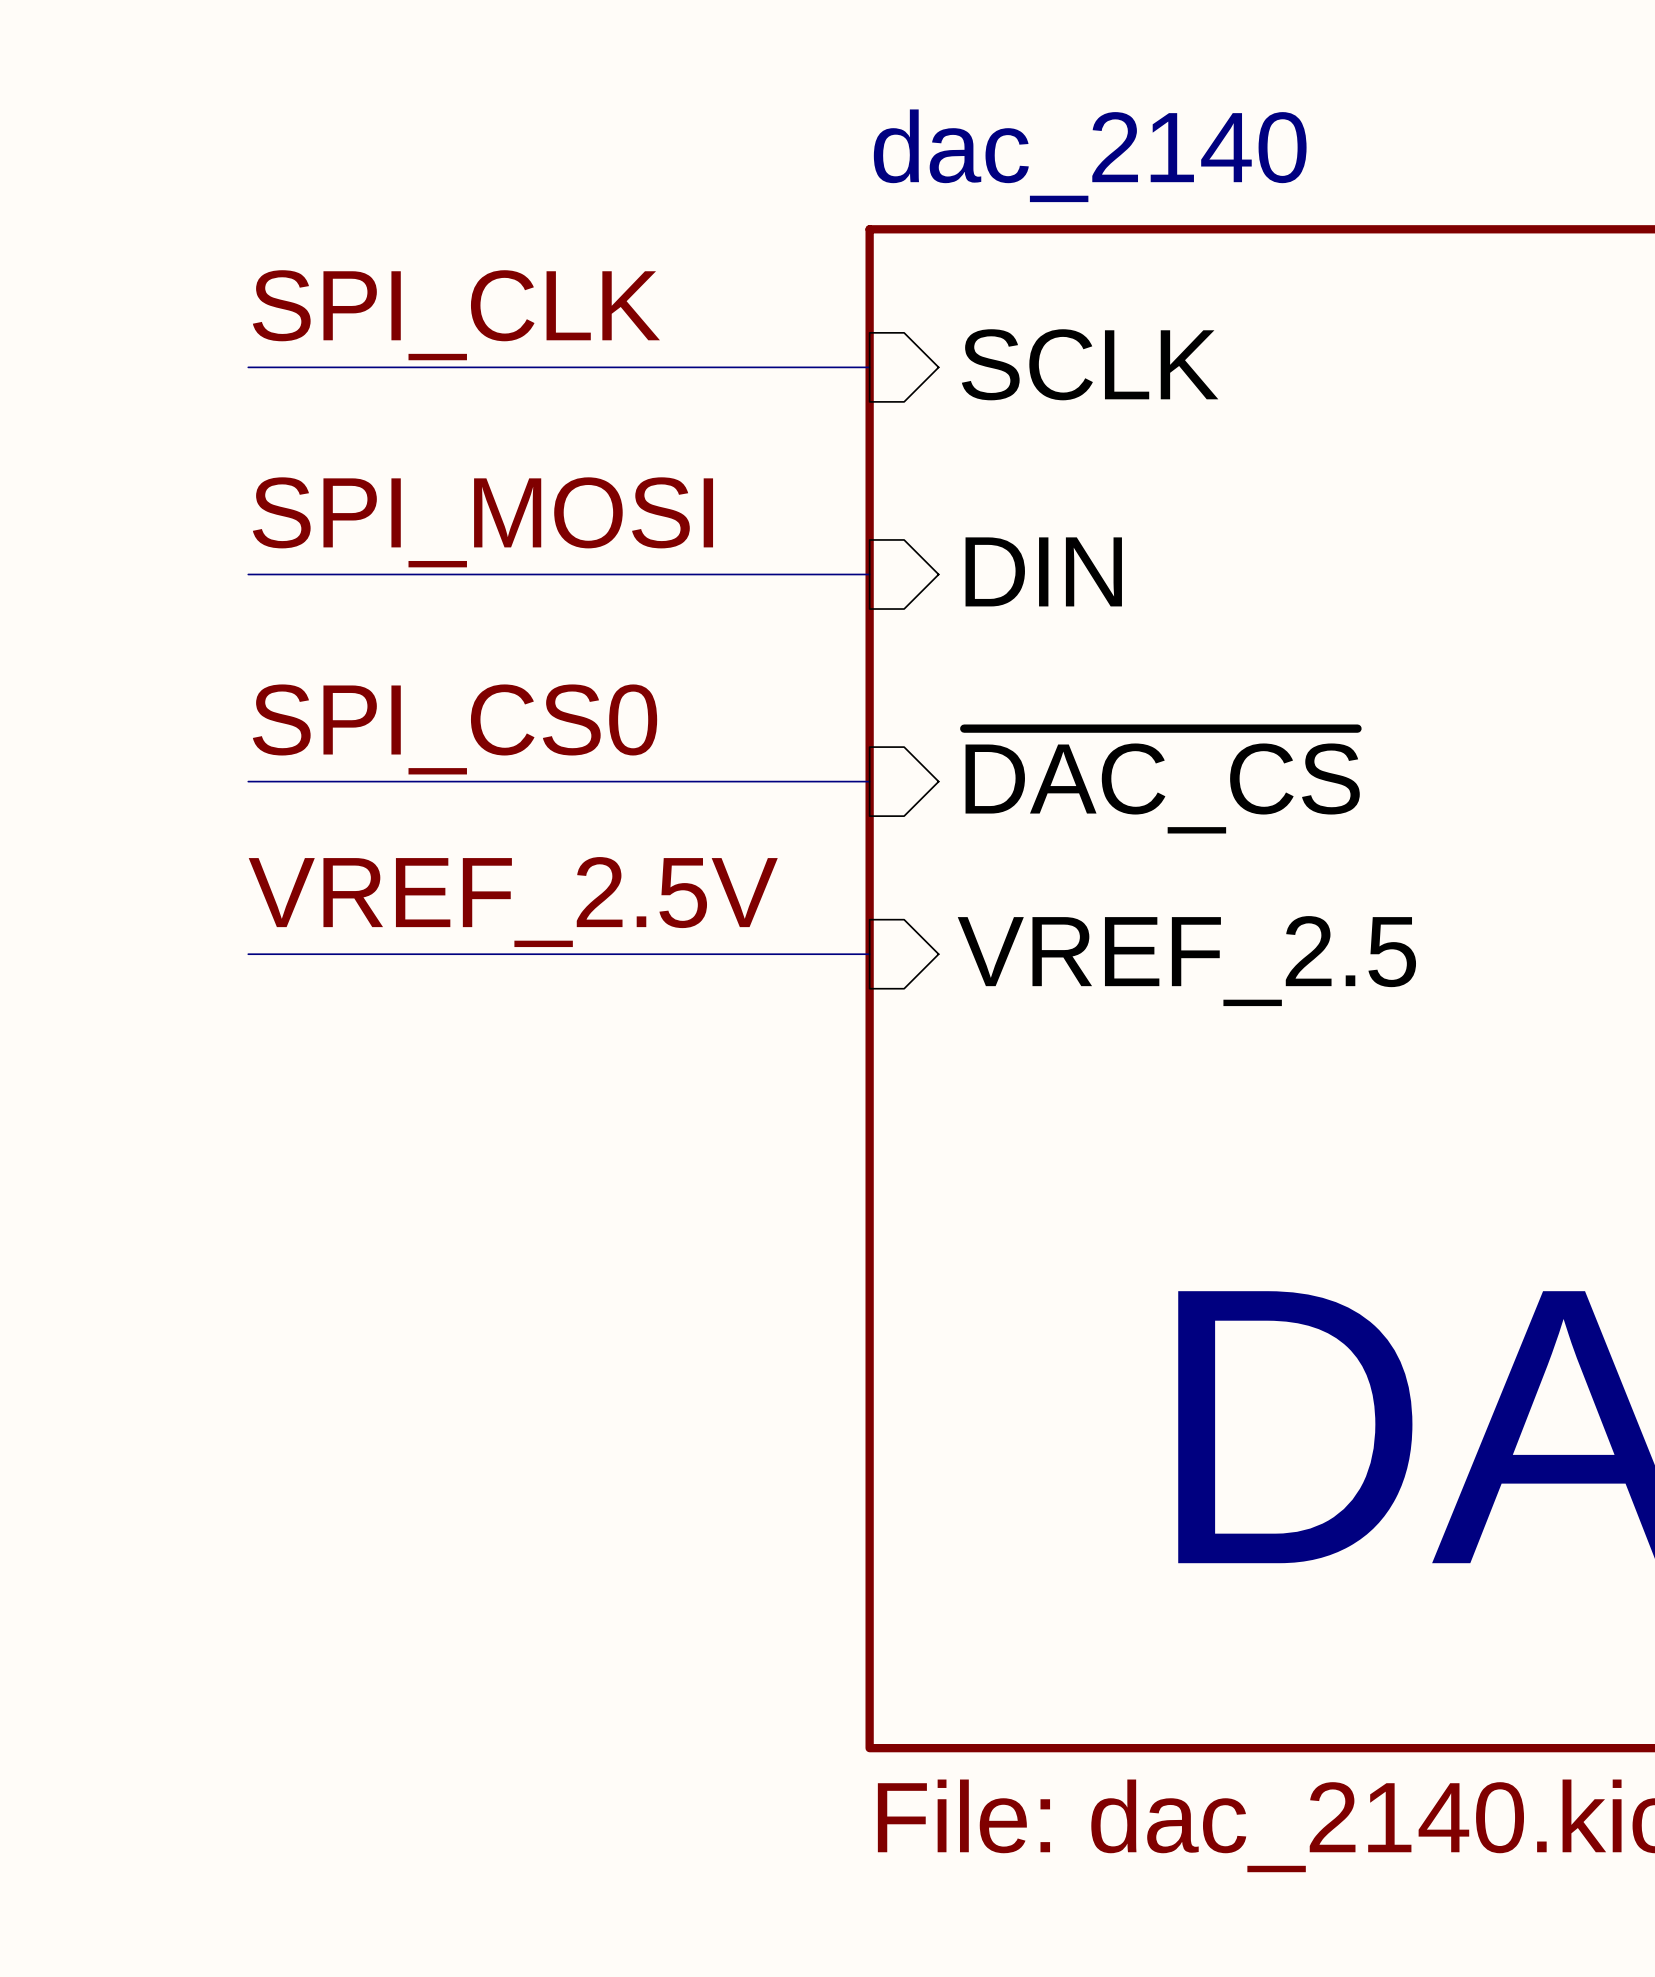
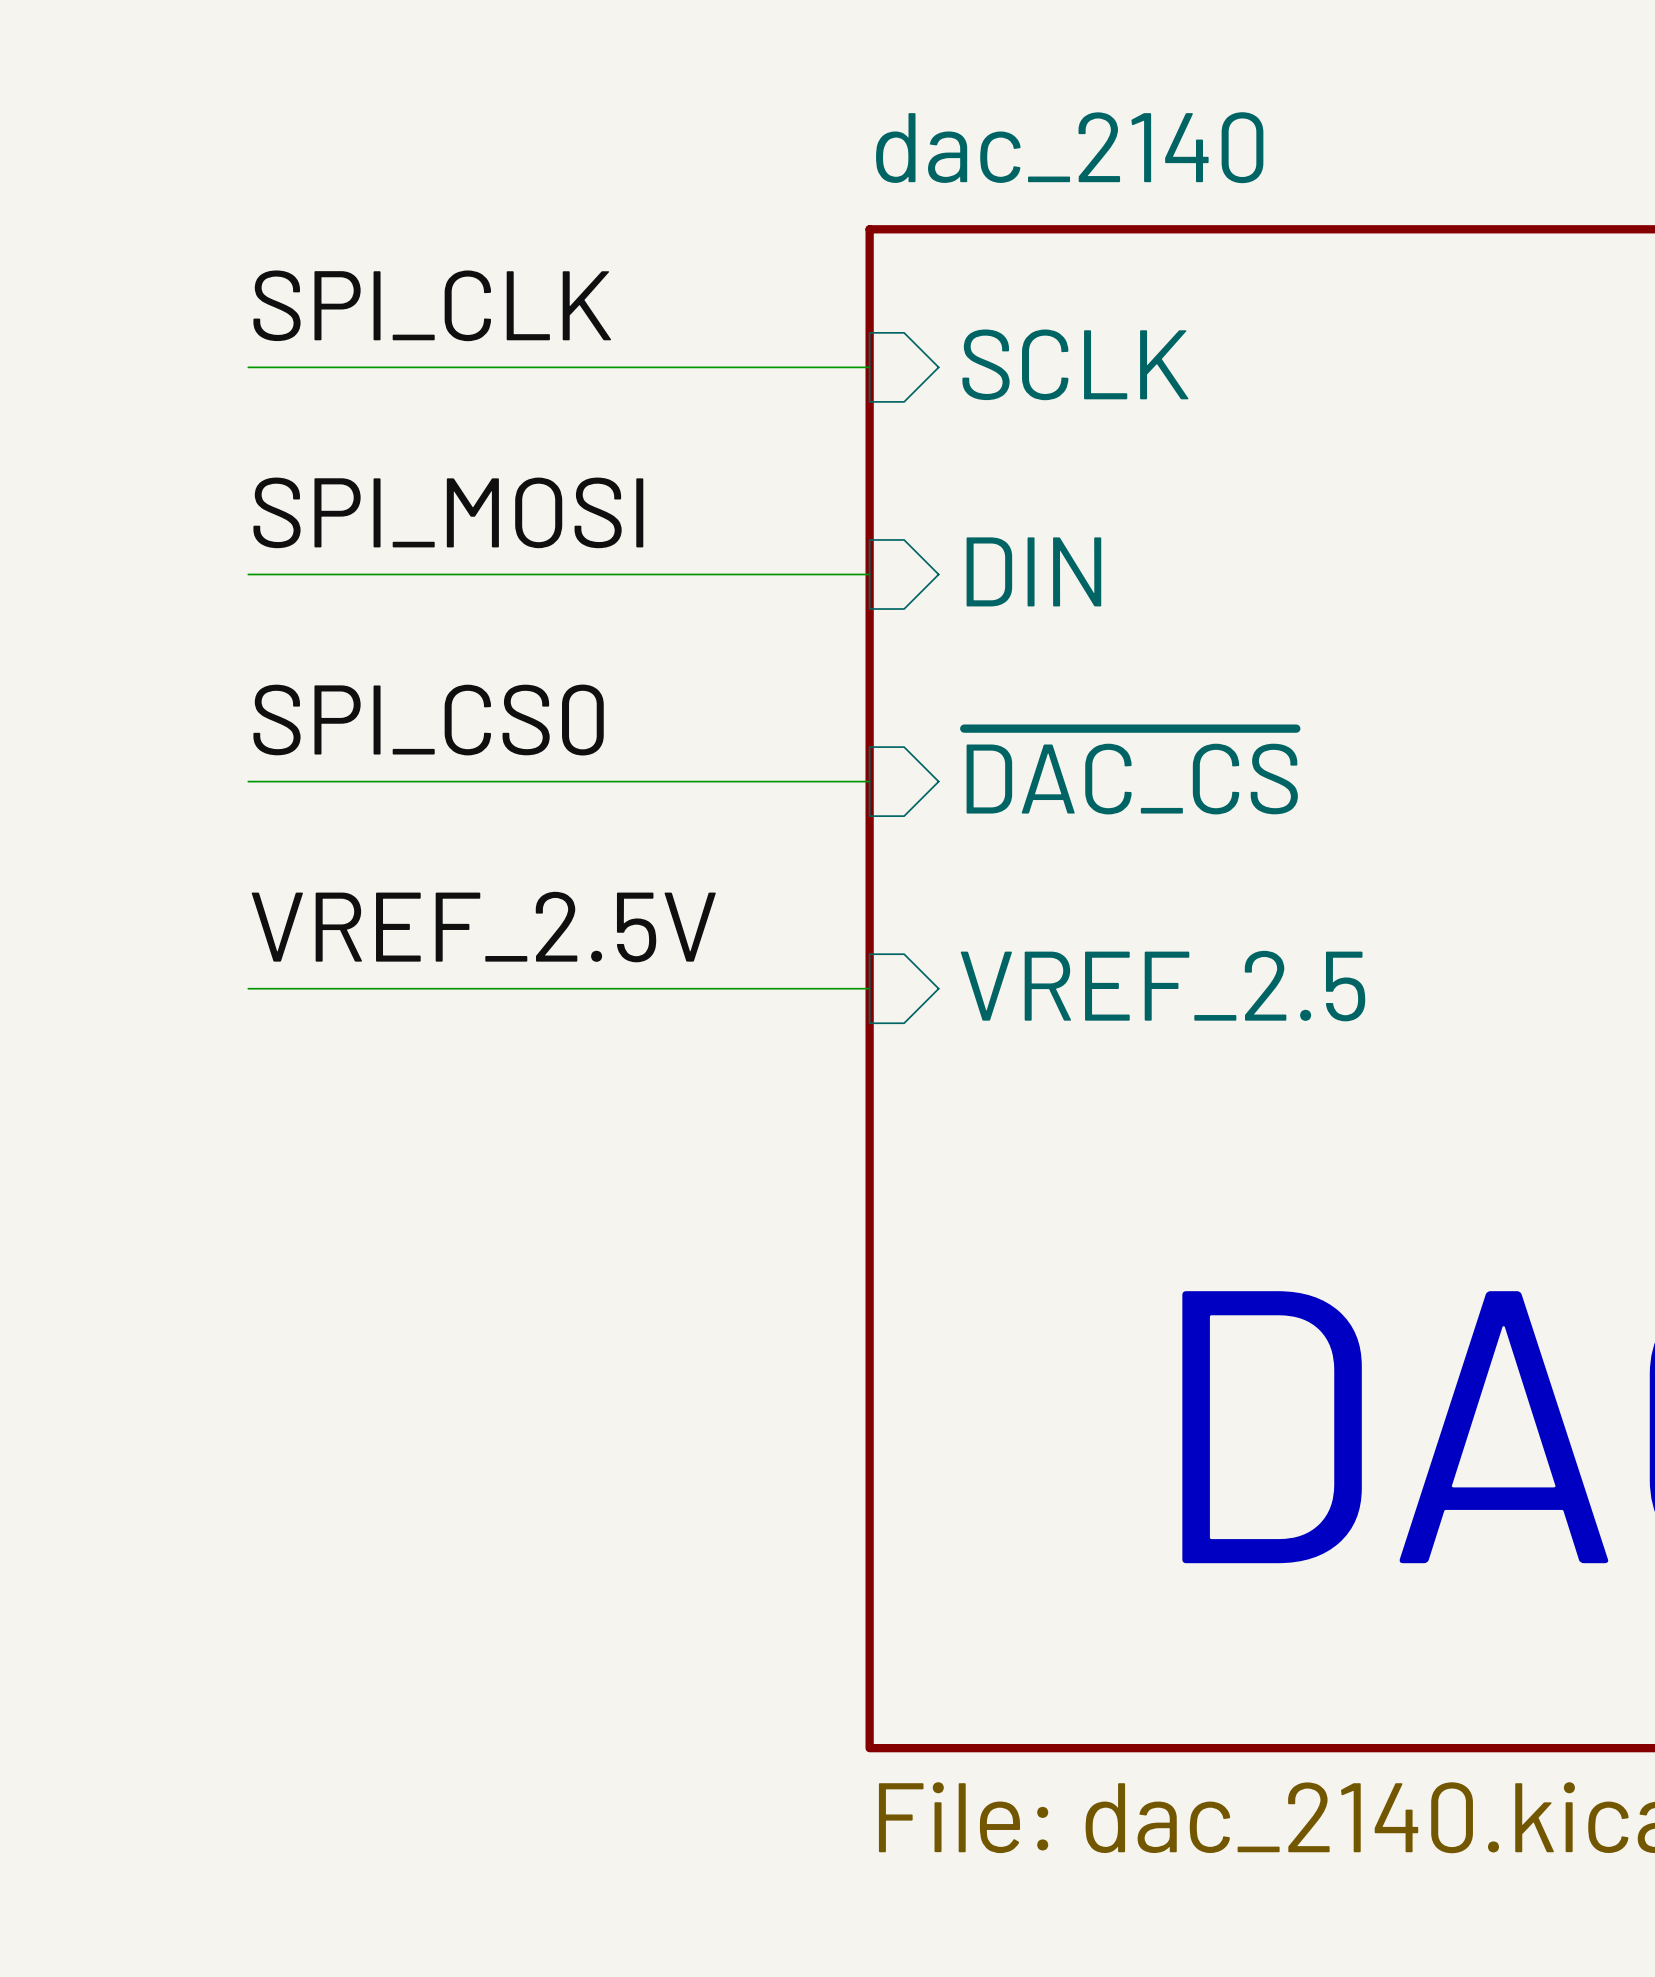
label position: VREF_2.5V (513, 902) -> VREF_2.5V (483, 927)
wire: (248, 954) (869, 954) -> (248, 988) (869, 988)
sheet pin position: VREF_2.5 (1186, 961) -> VREF_2.5 (1163, 986)

